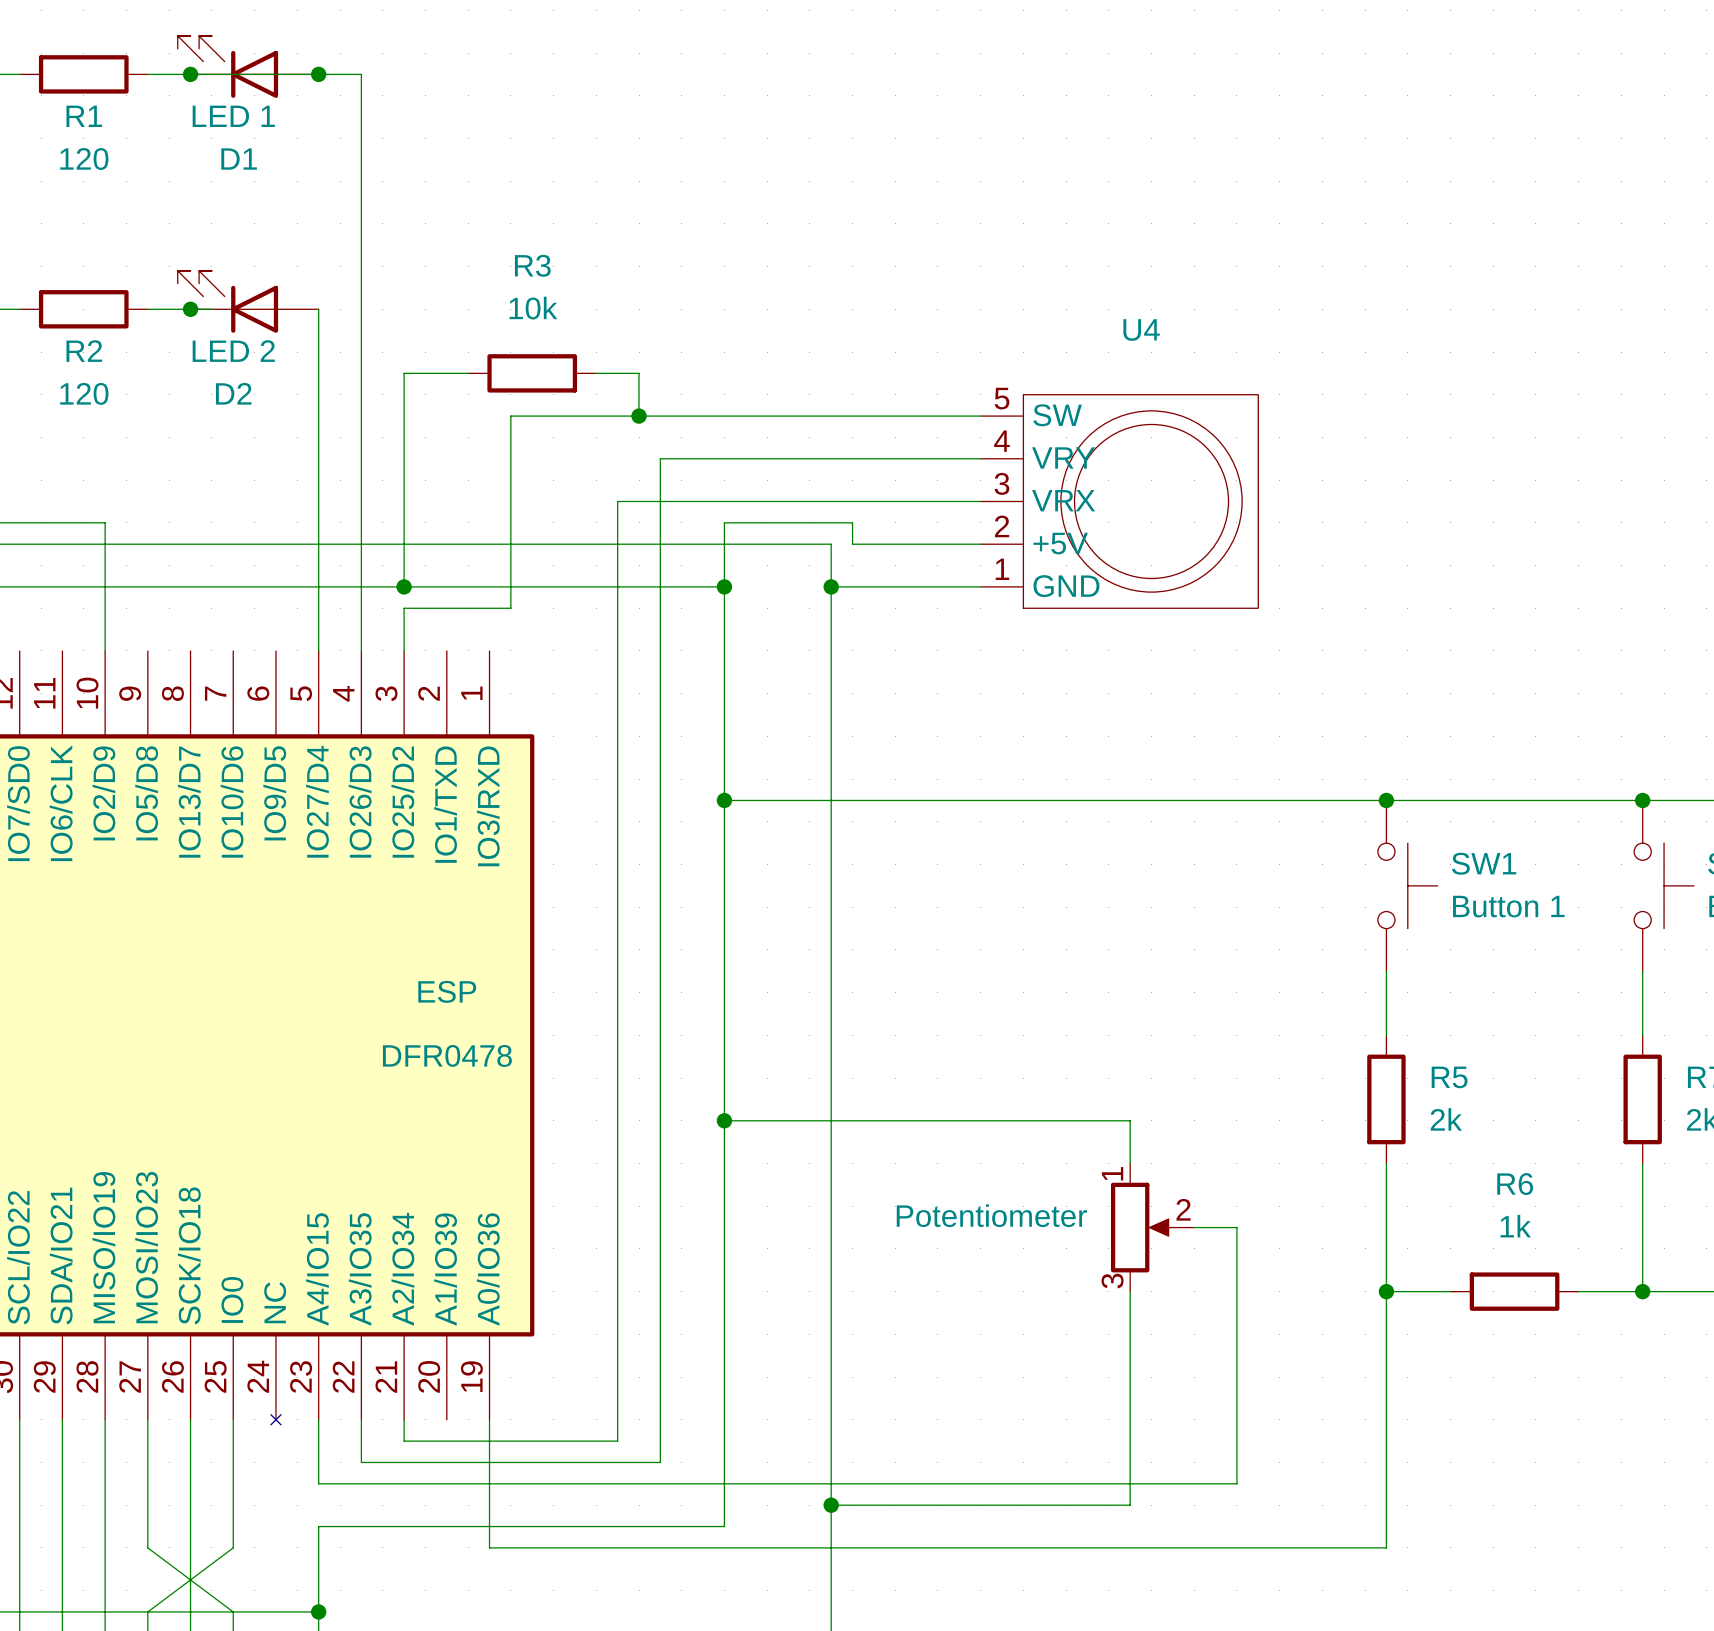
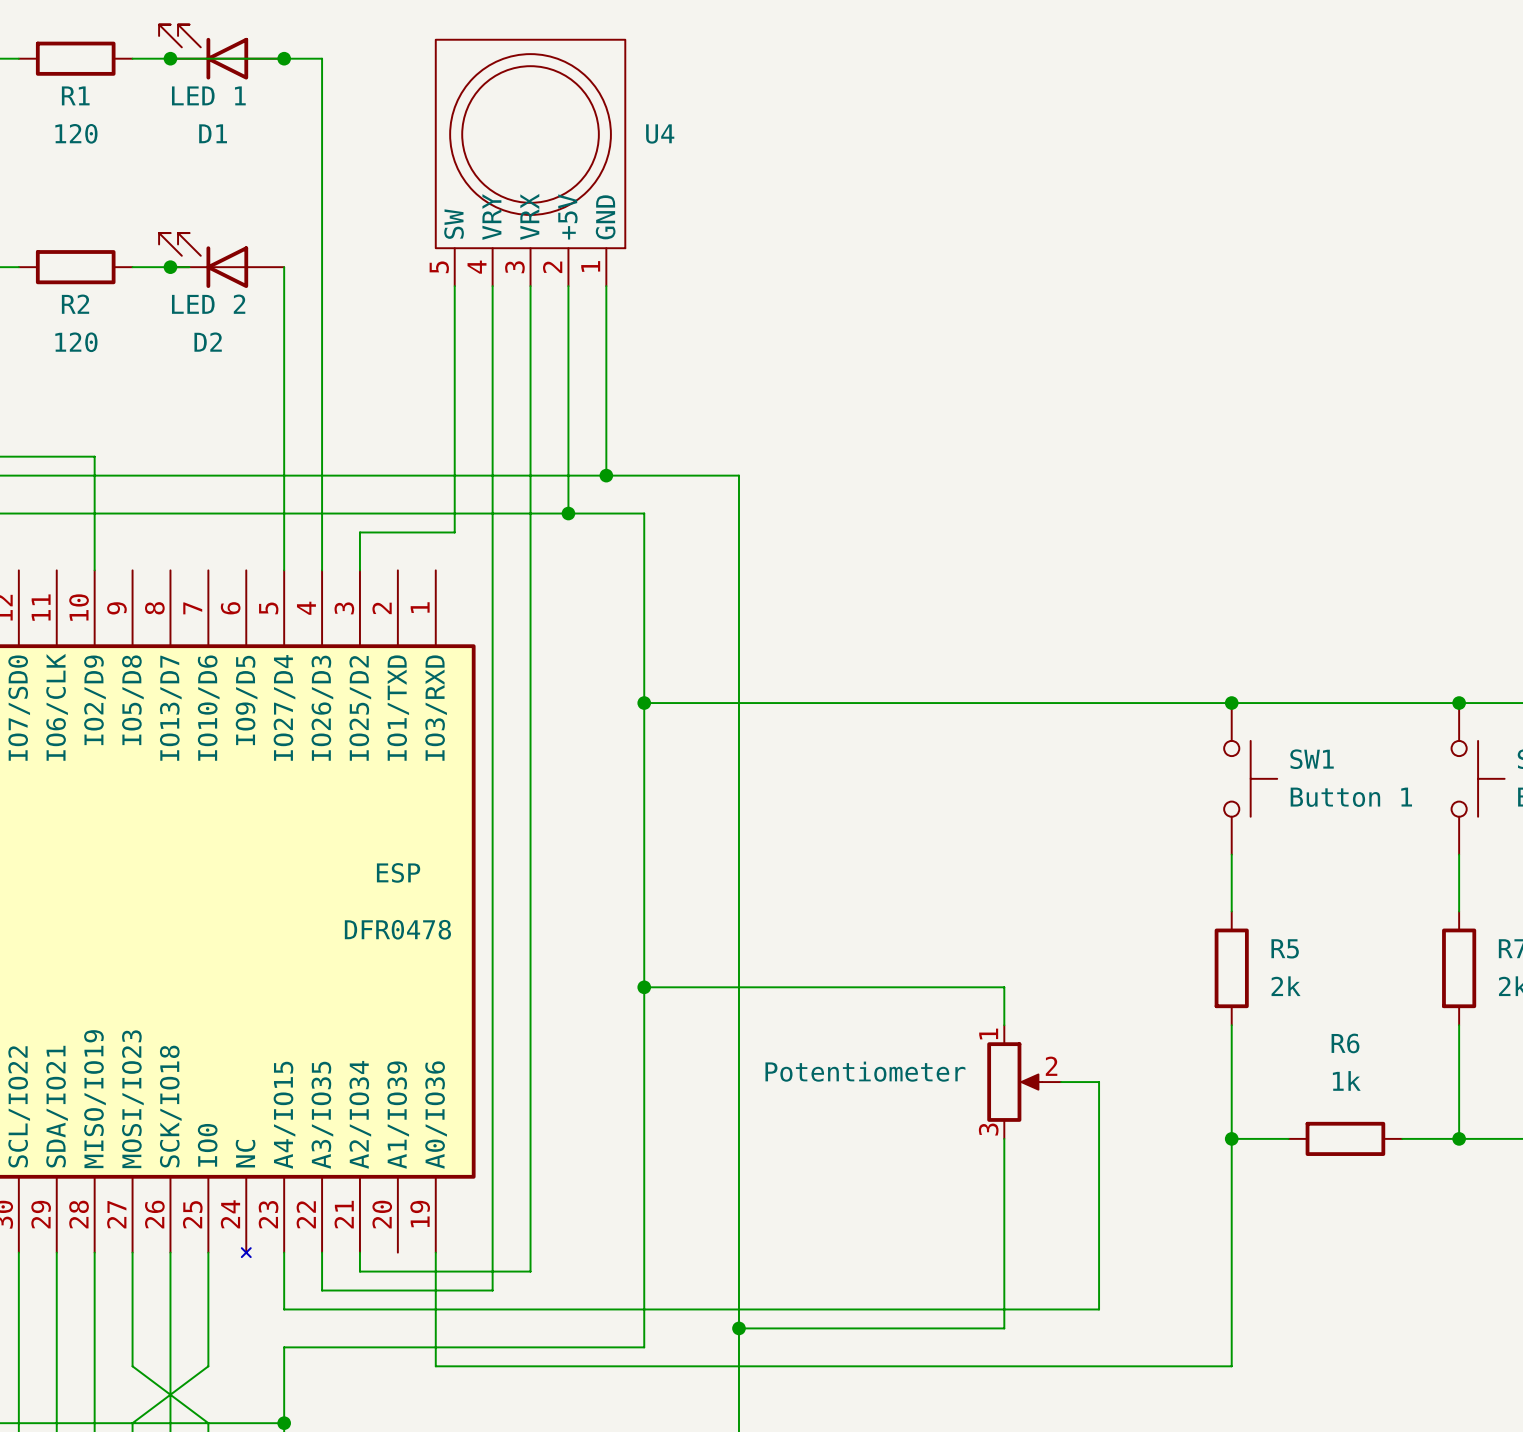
wire: none -> (606, 286) (606, 475)
U4 name position: U4 (1141, 330) -> U4 (660, 133)
wire: (468, 373) (404, 373) (404, 586) -> none
R3: 10k (532, 373) -> none
wire: (596, 373) (639, 373) -> (568, 286) (568, 324)
wire: (510, 416) (980, 416) -> (454, 361) (454, 286)
wire: none -> (568, 361) (568, 513)
junction: (639, 416) -> none
wire: (980, 458) (660, 458) (660, 1462) (553, 1462) -> (492, 286) (492, 1290)
wire: (980, 501) (617, 501) (617, 1441) (596, 1441) -> (530, 286) (530, 1271)
U4 position: (1119, 501) -> (530, 162)
U4 rotation: 0° (1140, 501) -> 90° counterclockwise (530, 143)
junction: none -> (606, 475)
wire: (980, 544) (852, 544) (852, 522) (724, 522) (724, 586) -> none
junction: (404, 586) -> none
junction: none -> (568, 513)
junction: (724, 586) -> none
wire: (831, 586) (980, 586) -> none
junction: (831, 586) -> none

